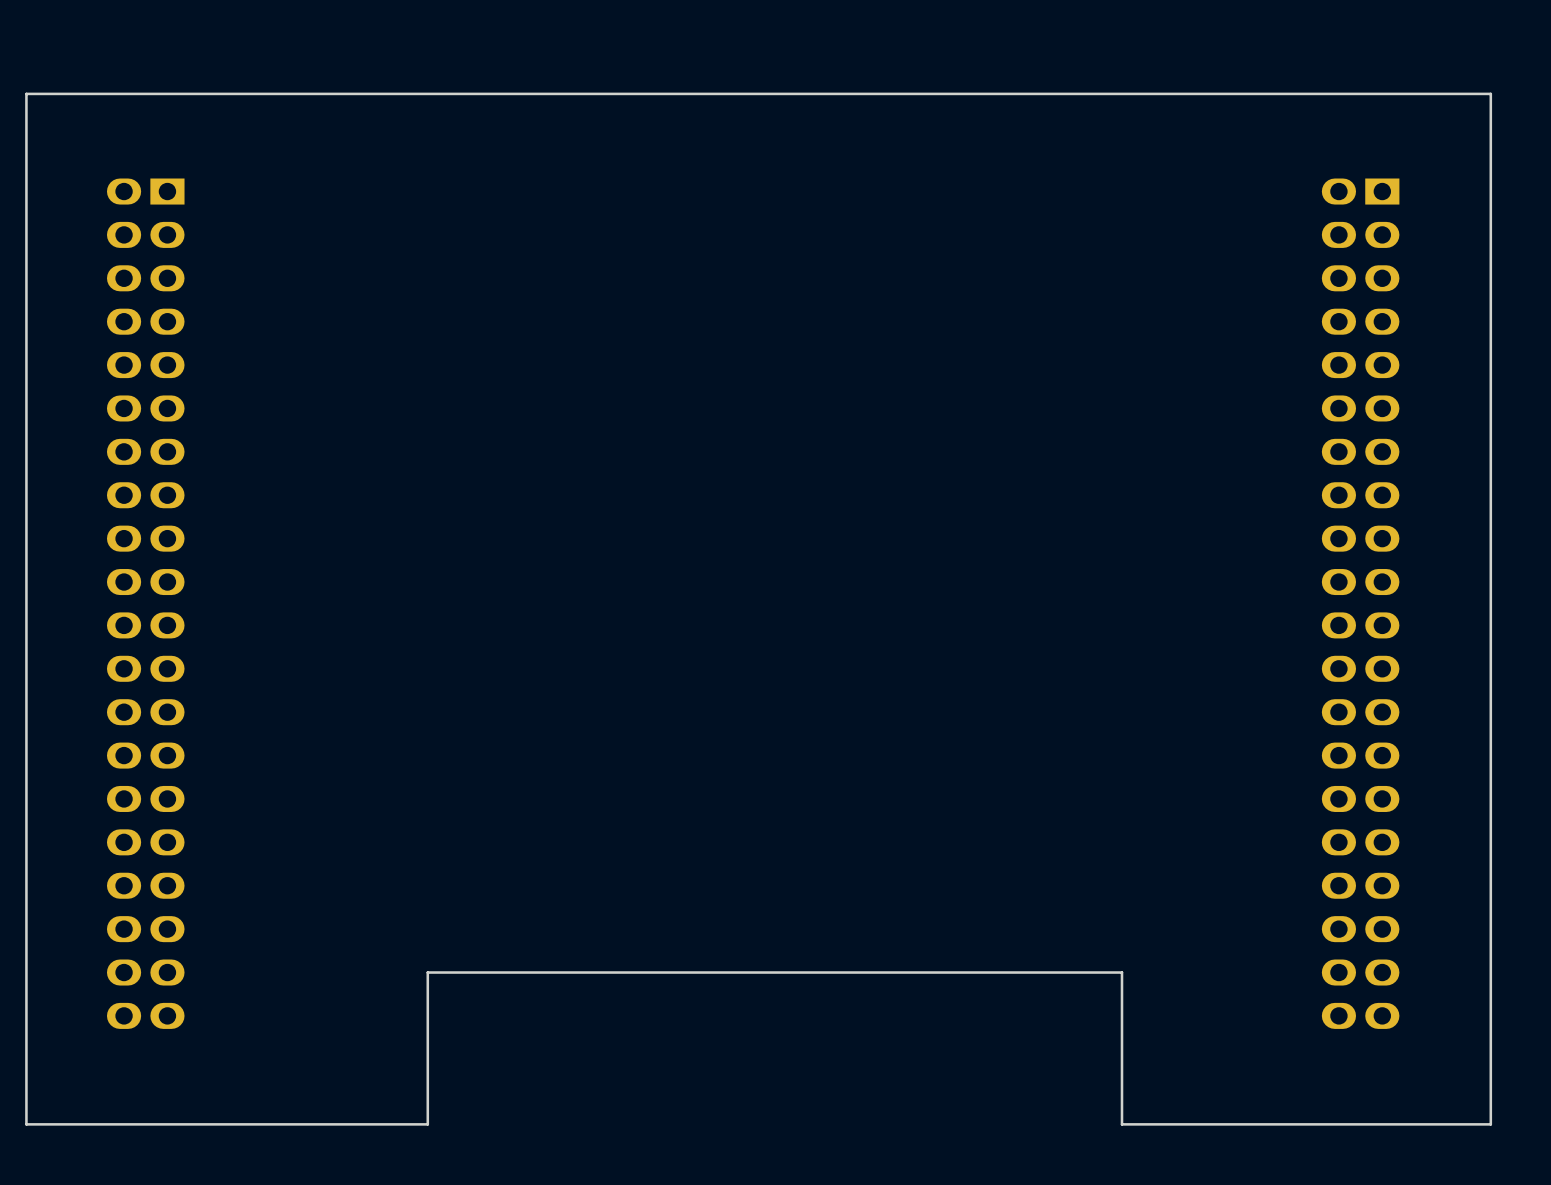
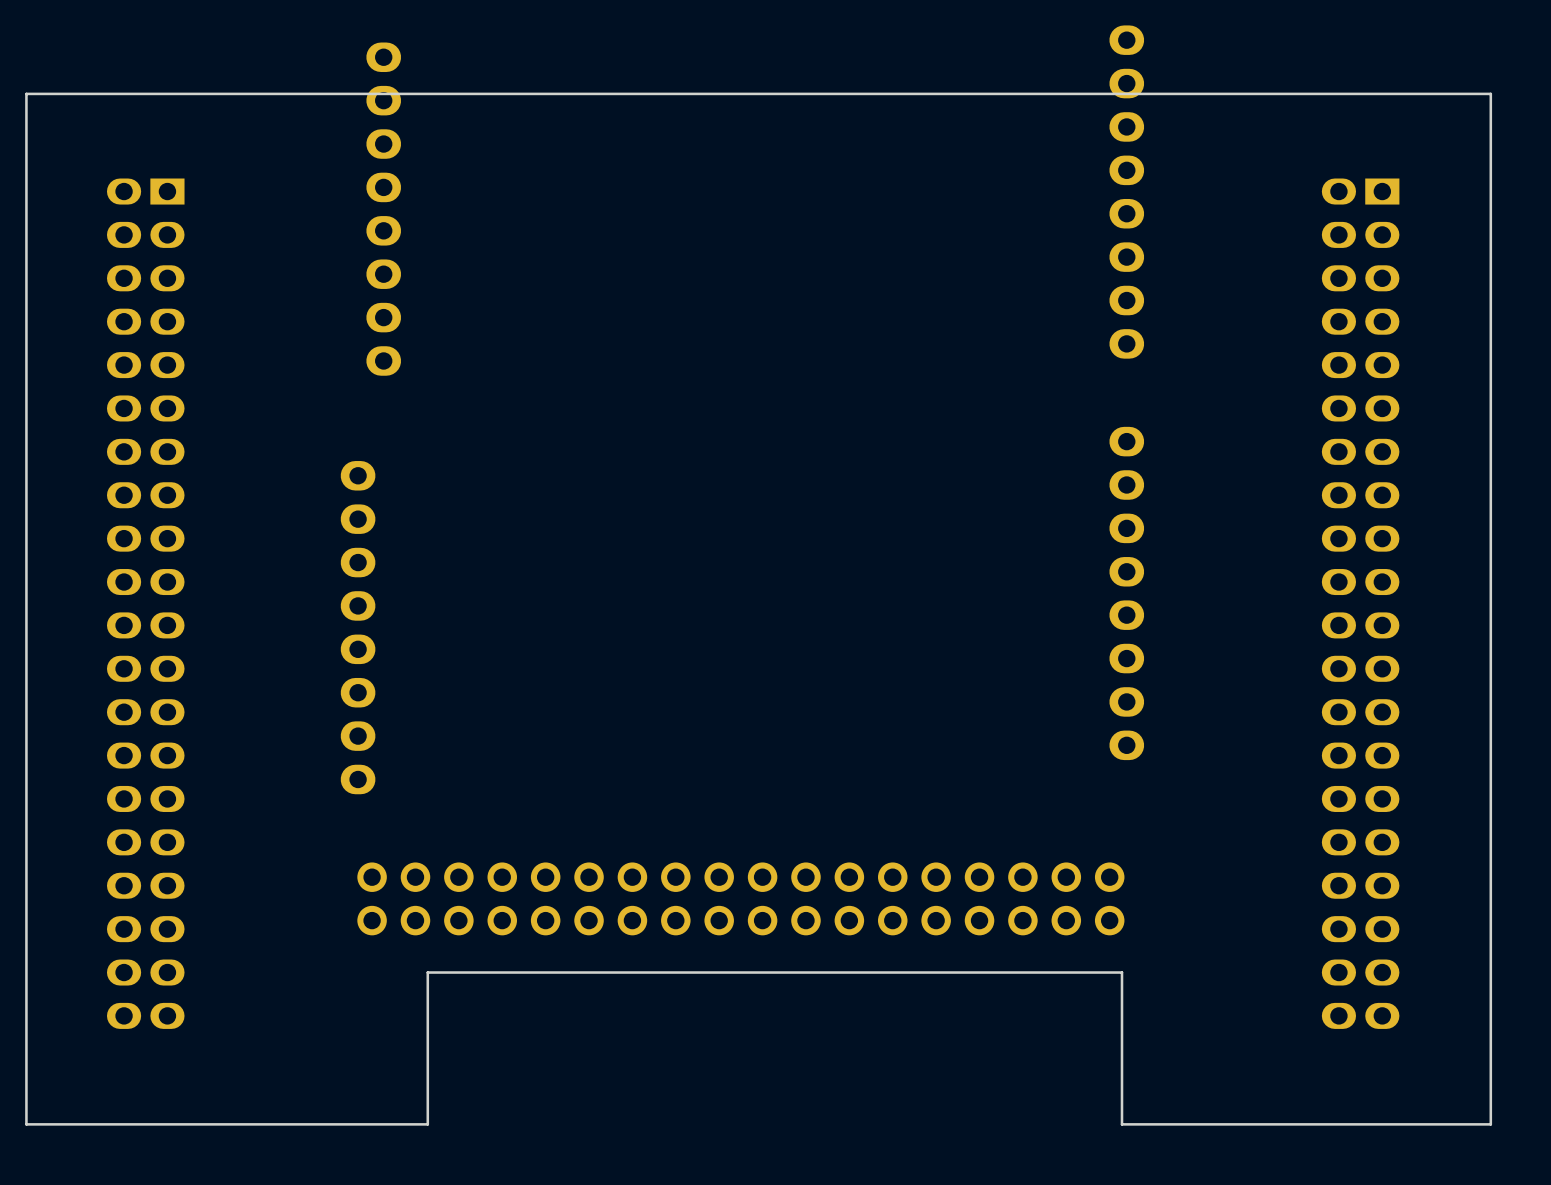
part: none -> (1126, 192)
part: none -> (383, 209)
part: none -> (1126, 593)
part: none -> (358, 627)
part: none -> (740, 898)

